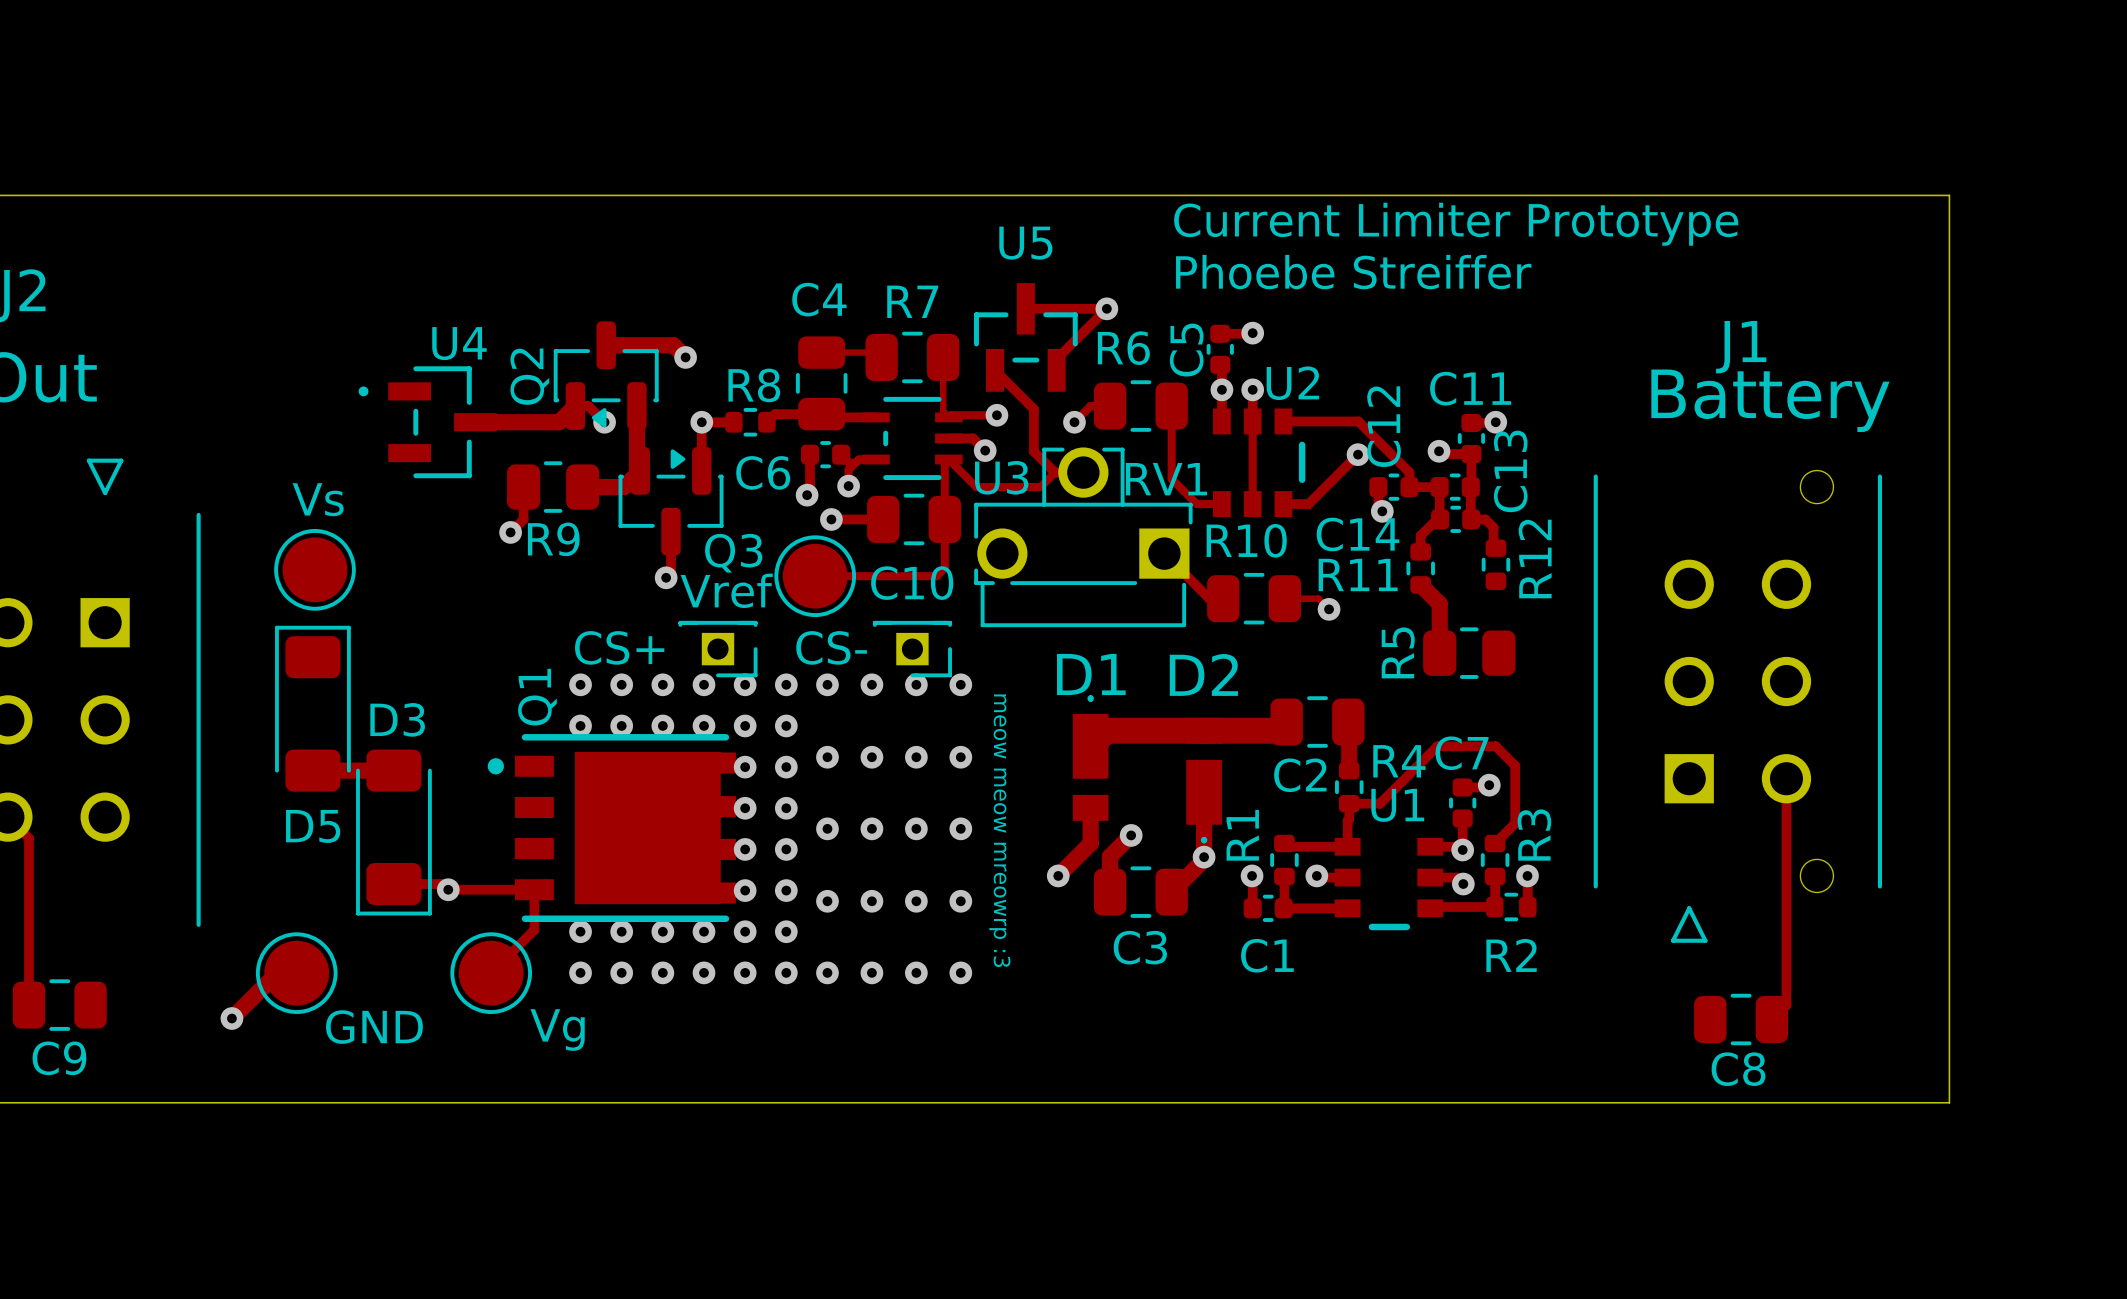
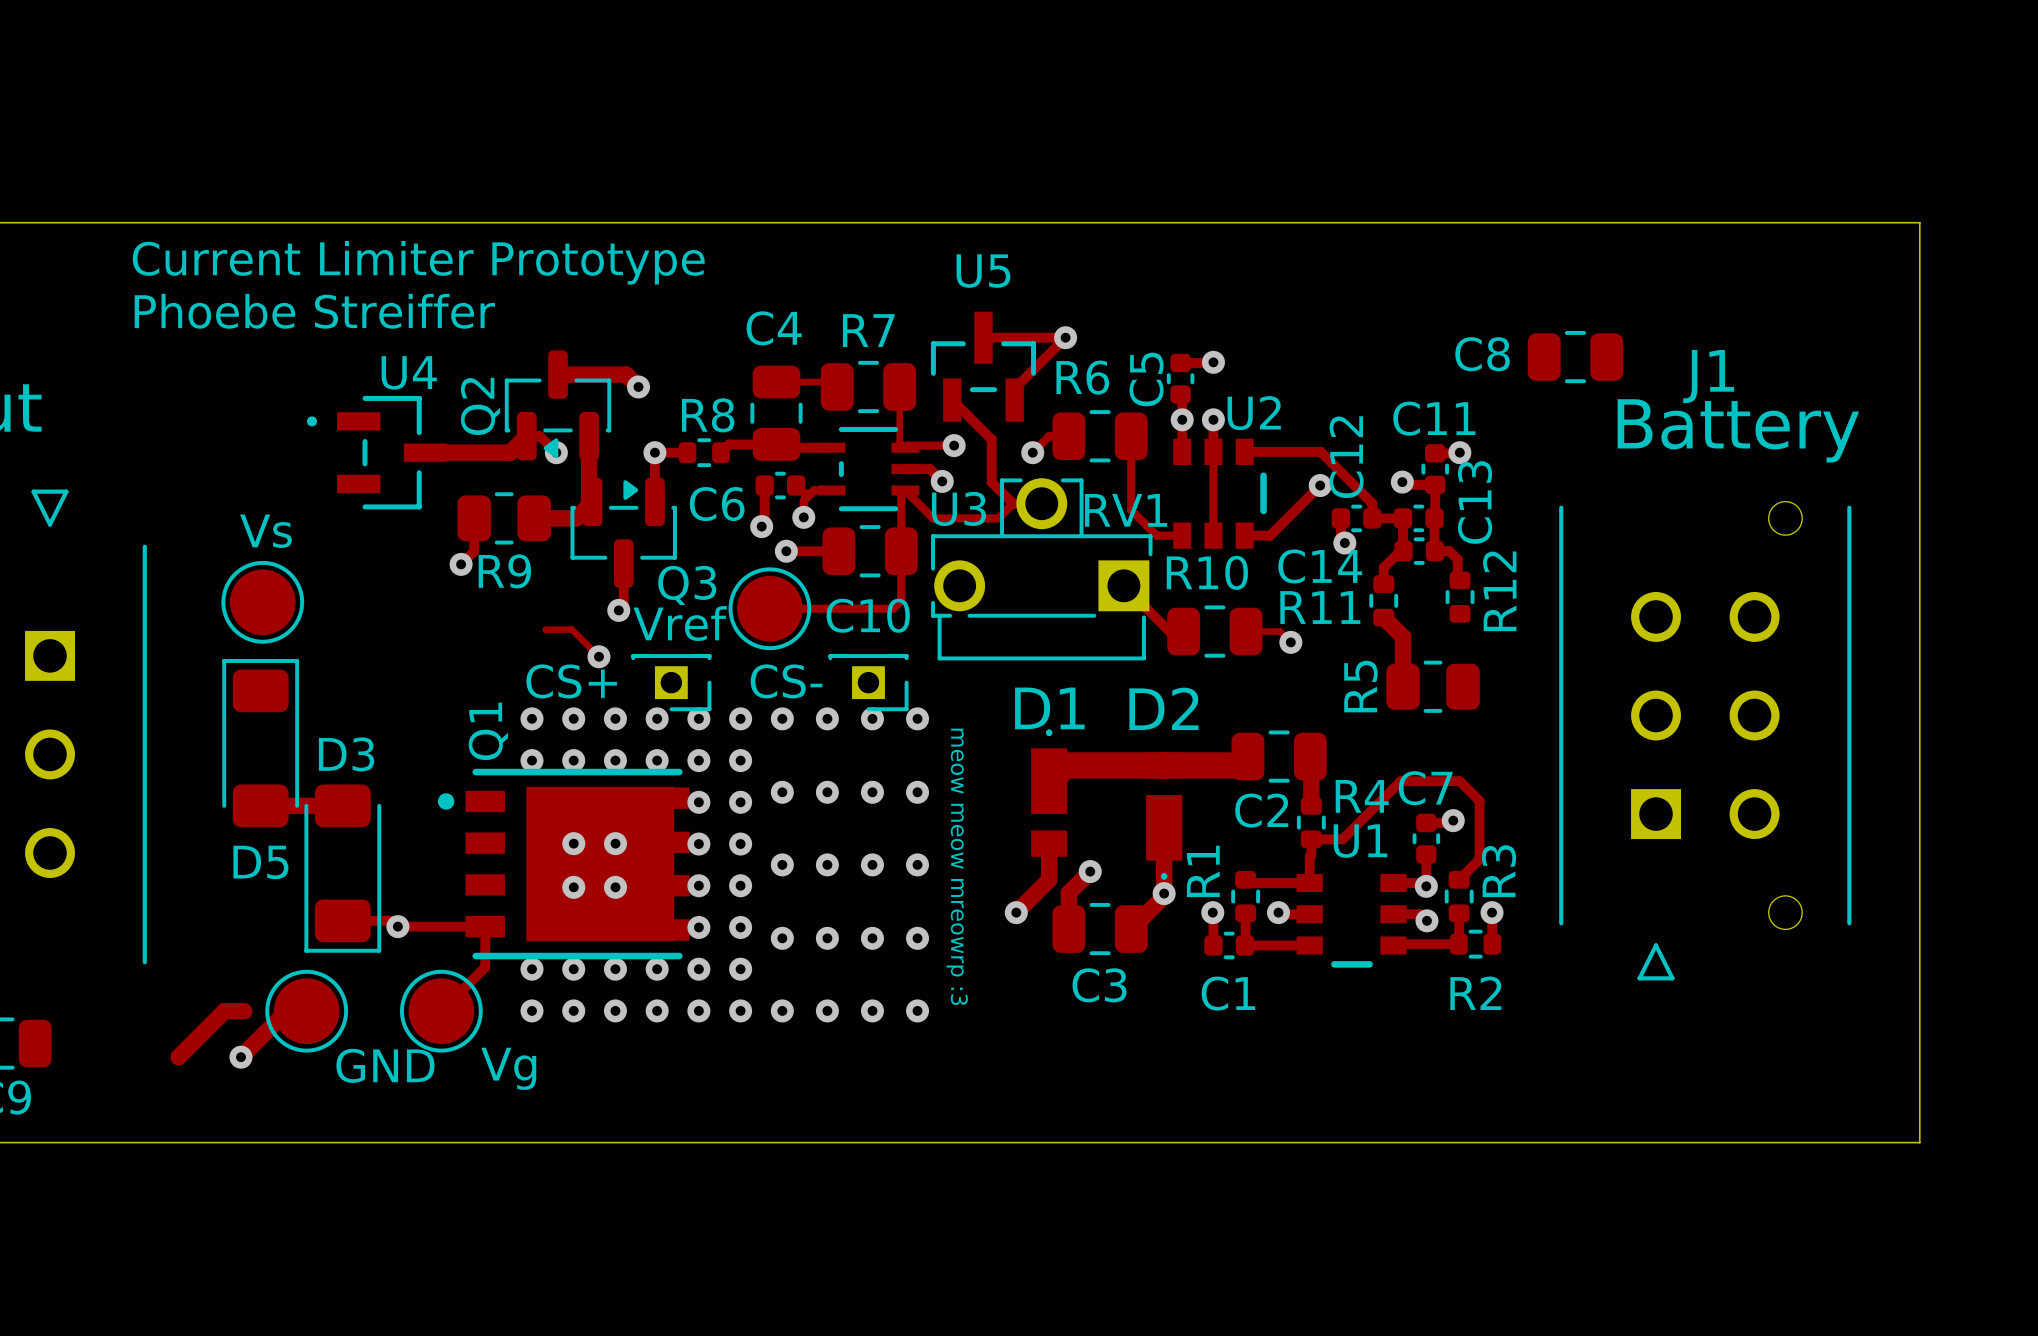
text: Current Limiter Prototype (1456, 224) -> none
text: none -> Current Limiter Prototype (418, 262)
text: Phoebe Streiffer (1353, 272) -> none
text: none -> Phoebe Streiffer (314, 311)
track: none -> (545, 629) (571, 629) (598, 656)
via: none -> (598, 656)
track: (1786, 778) (1786, 1004) (1771, 1019) -> none
via: none -> (573, 843)
via: none -> (615, 843)
via: none -> (573, 887)
via: none -> (615, 887)
part position: (296, 973) -> (306, 1011)
track: none -> (286, 1011) (240, 1057)
via: (231, 1018) -> none
via: none -> (240, 1057)
C8 position: (1741, 1019) -> (1575, 357)
C8 name position: C8 (1738, 1069) -> C8 (1482, 354)

